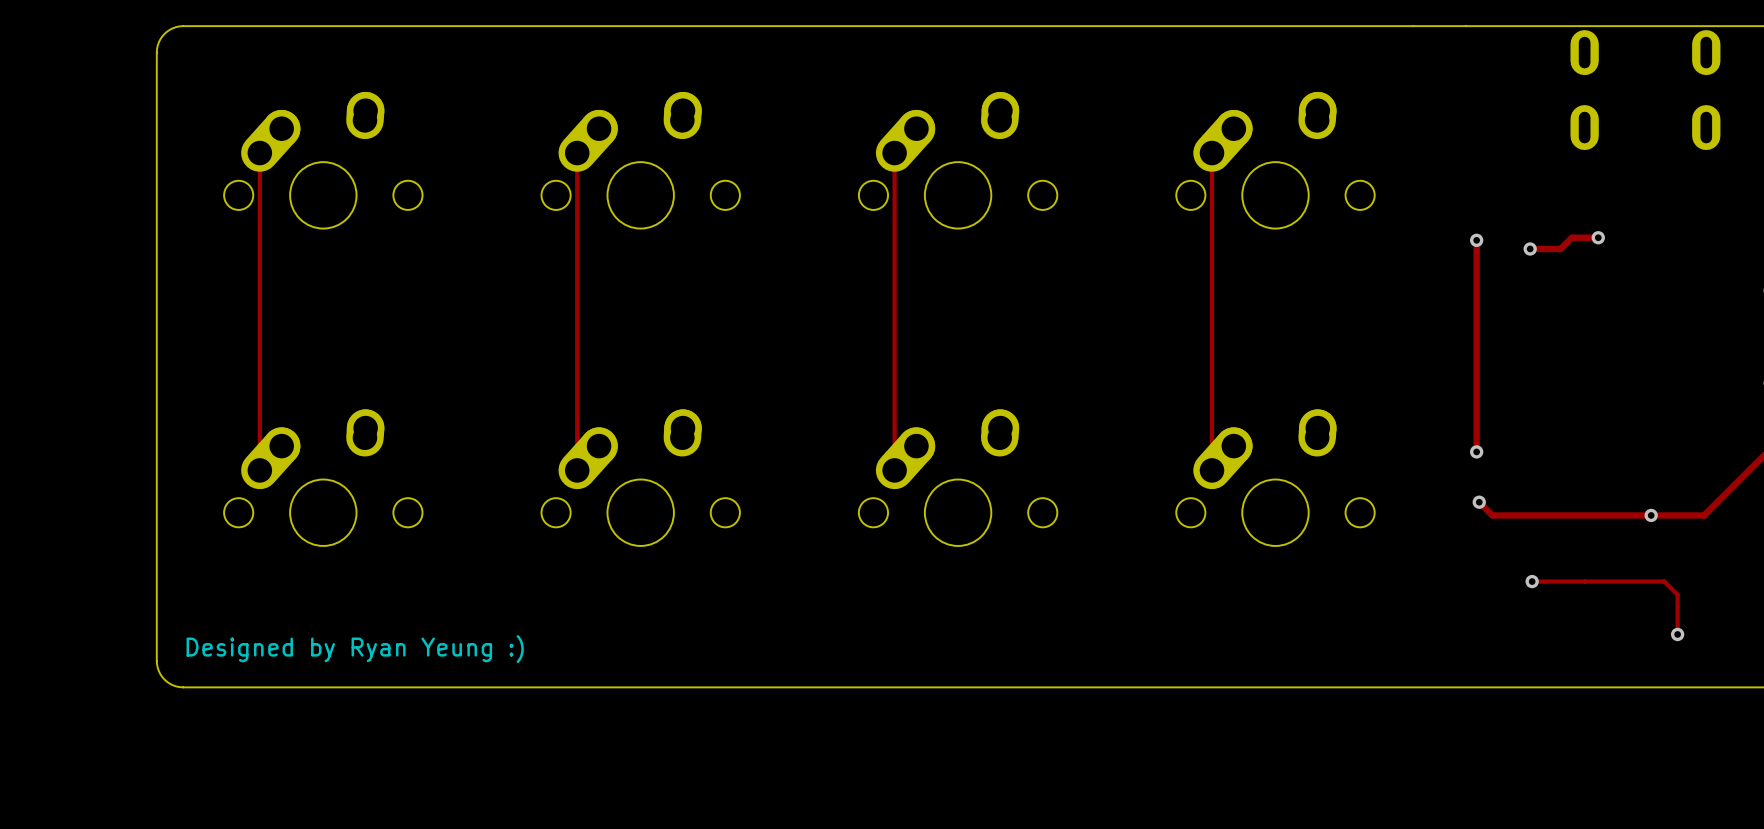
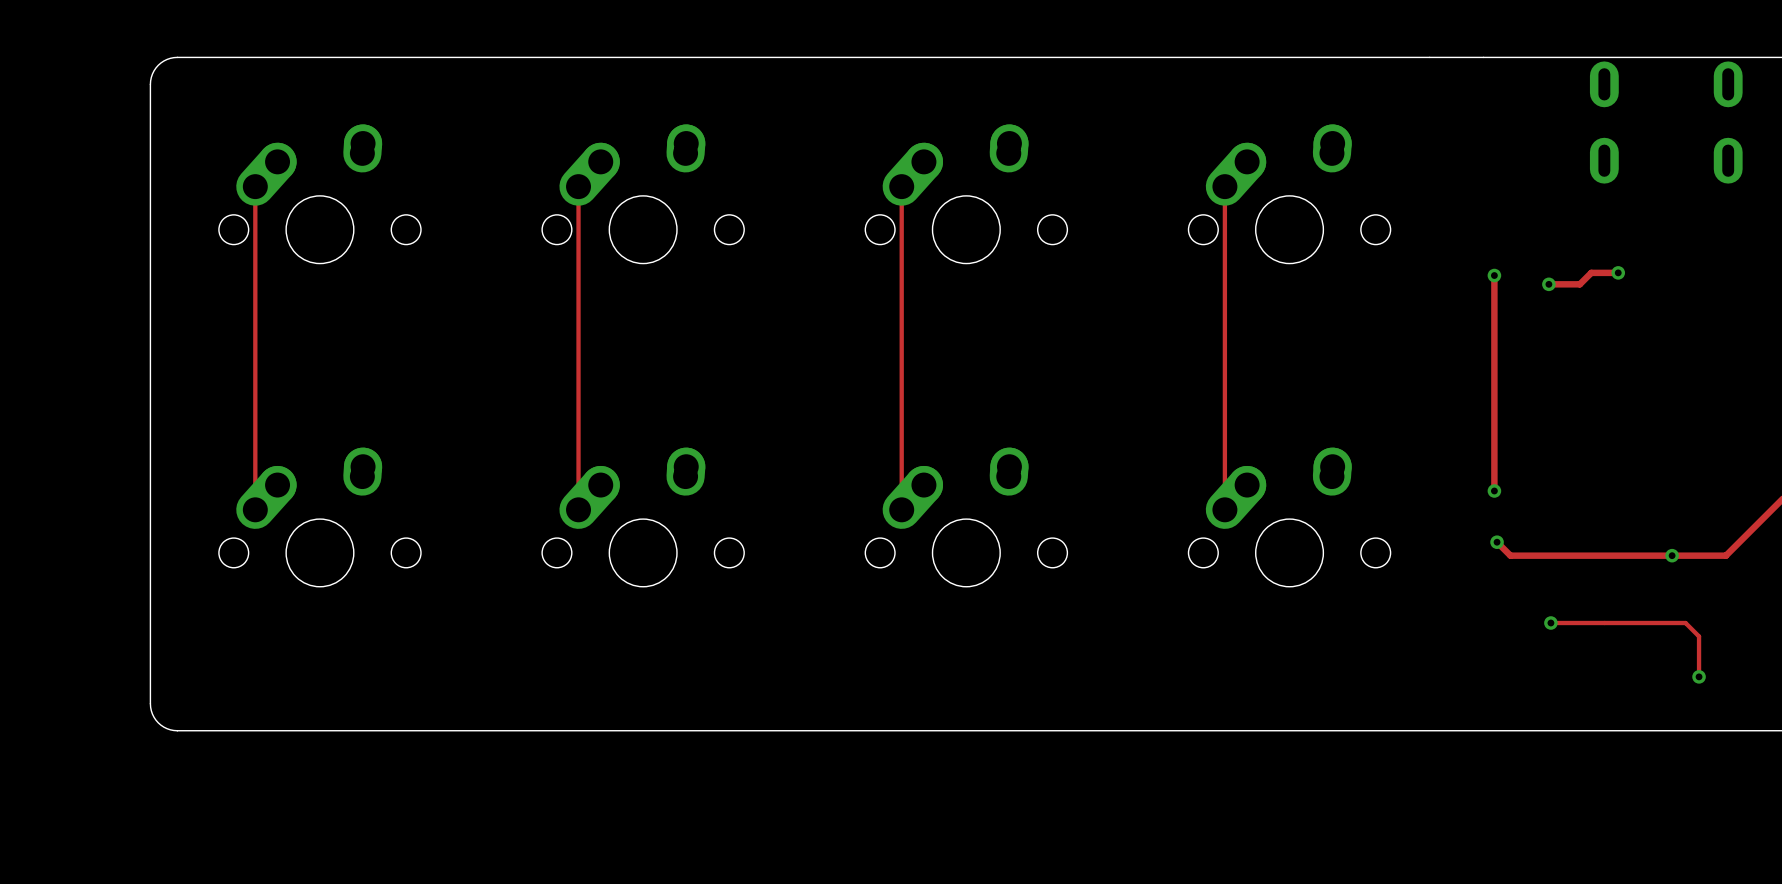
text: Designed by Ryan Yeung :) (355, 649) -> none

